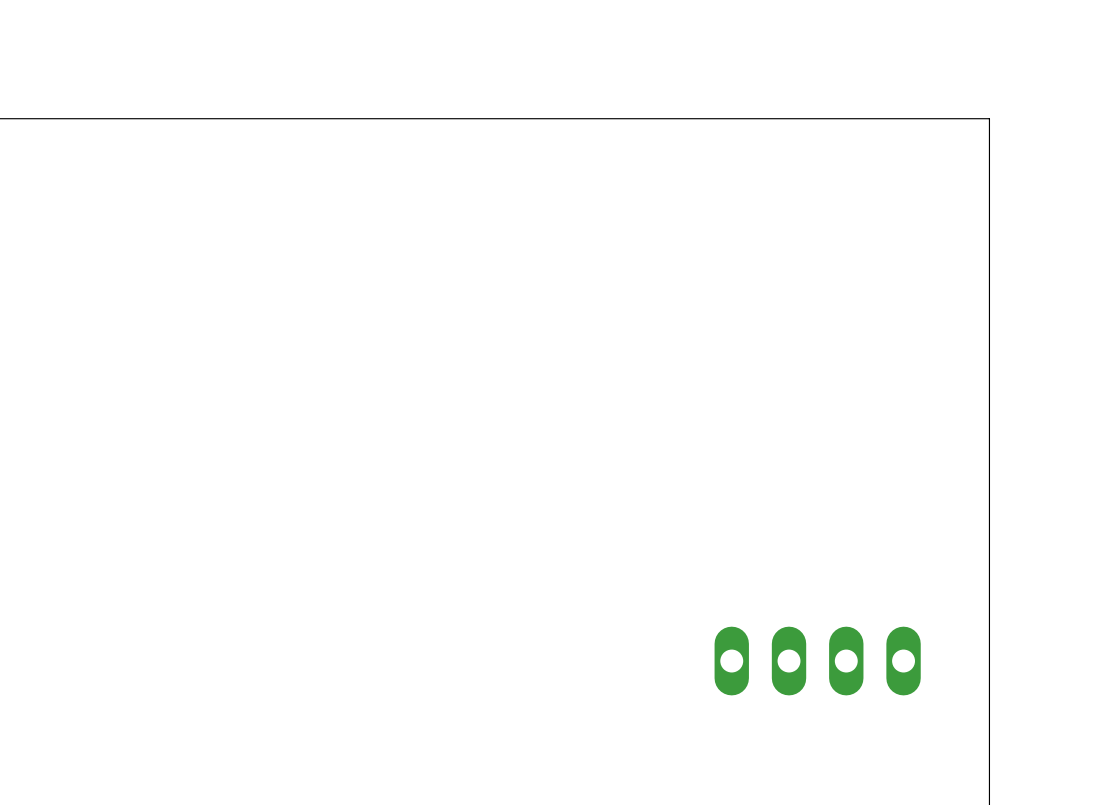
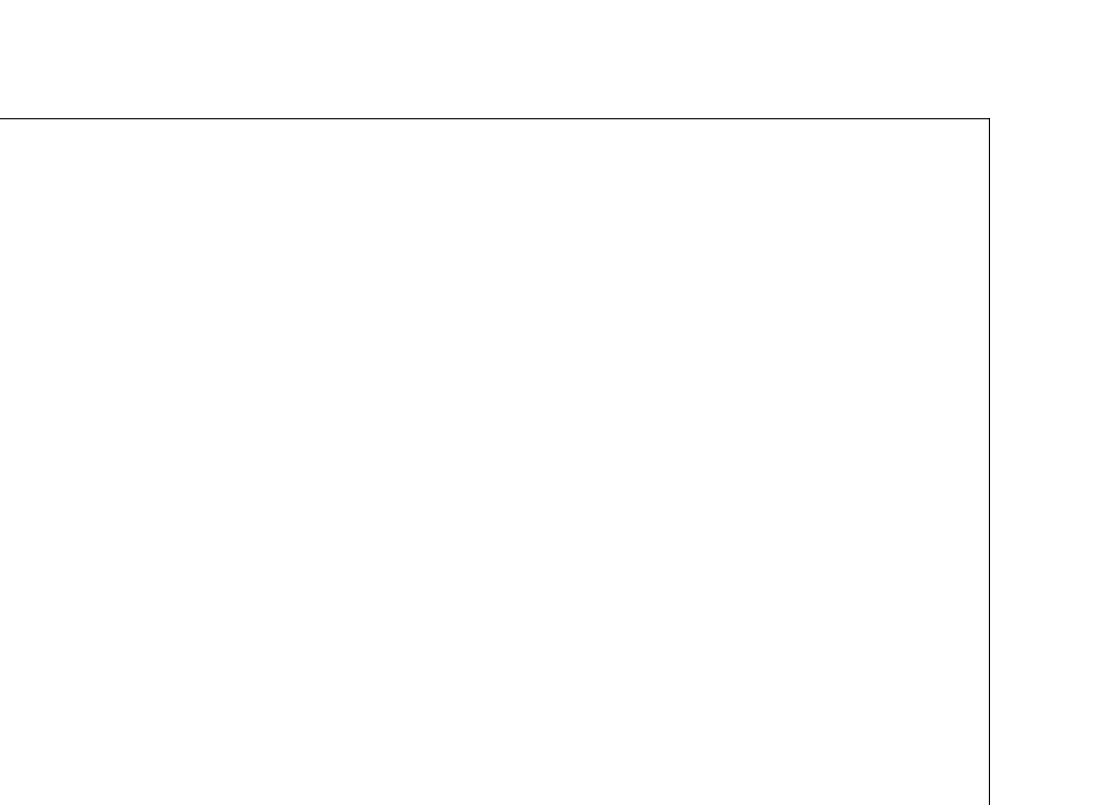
part: (817, 661) -> none

